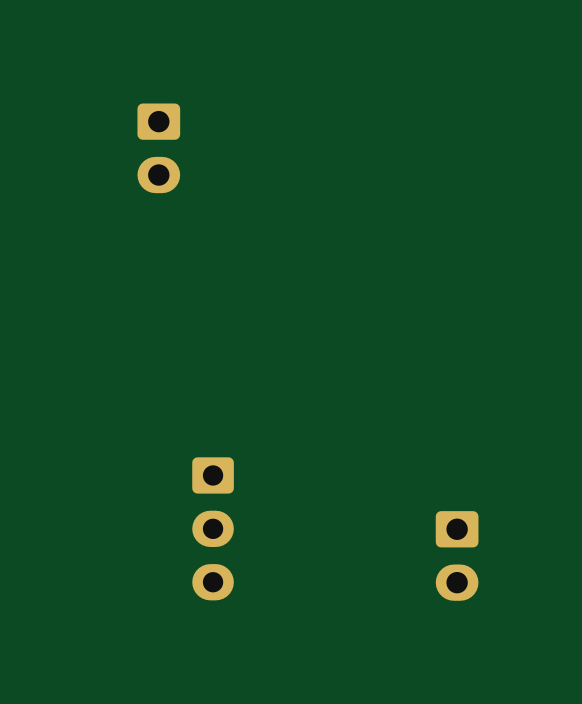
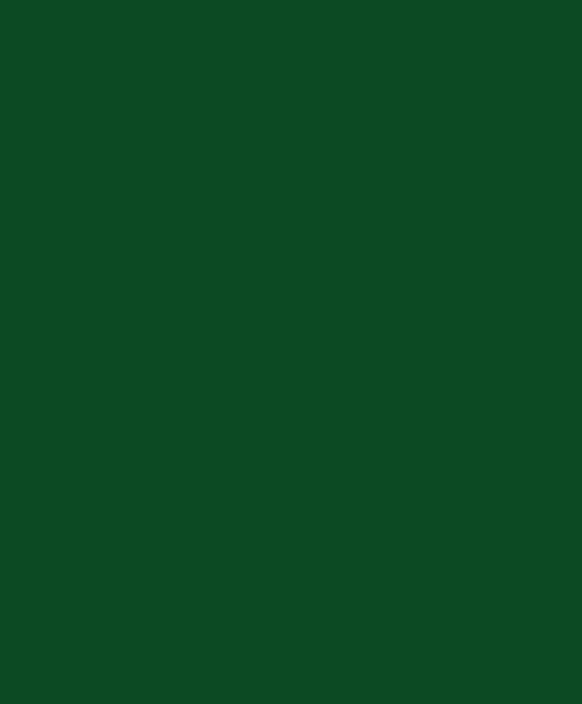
part: (158, 148) -> none
part: (213, 528) -> none
part: (457, 555) -> none

